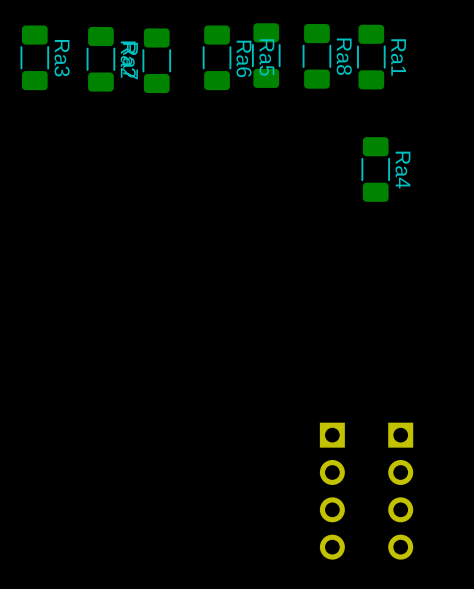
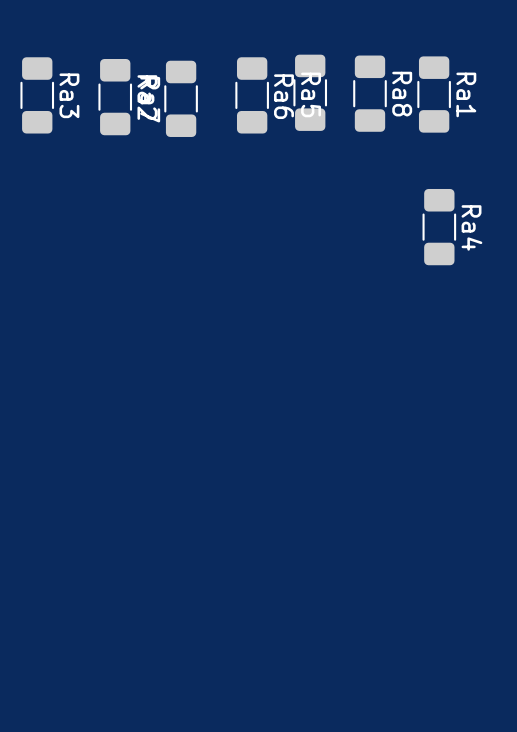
part: (332, 491) -> none
part: (400, 491) -> none

